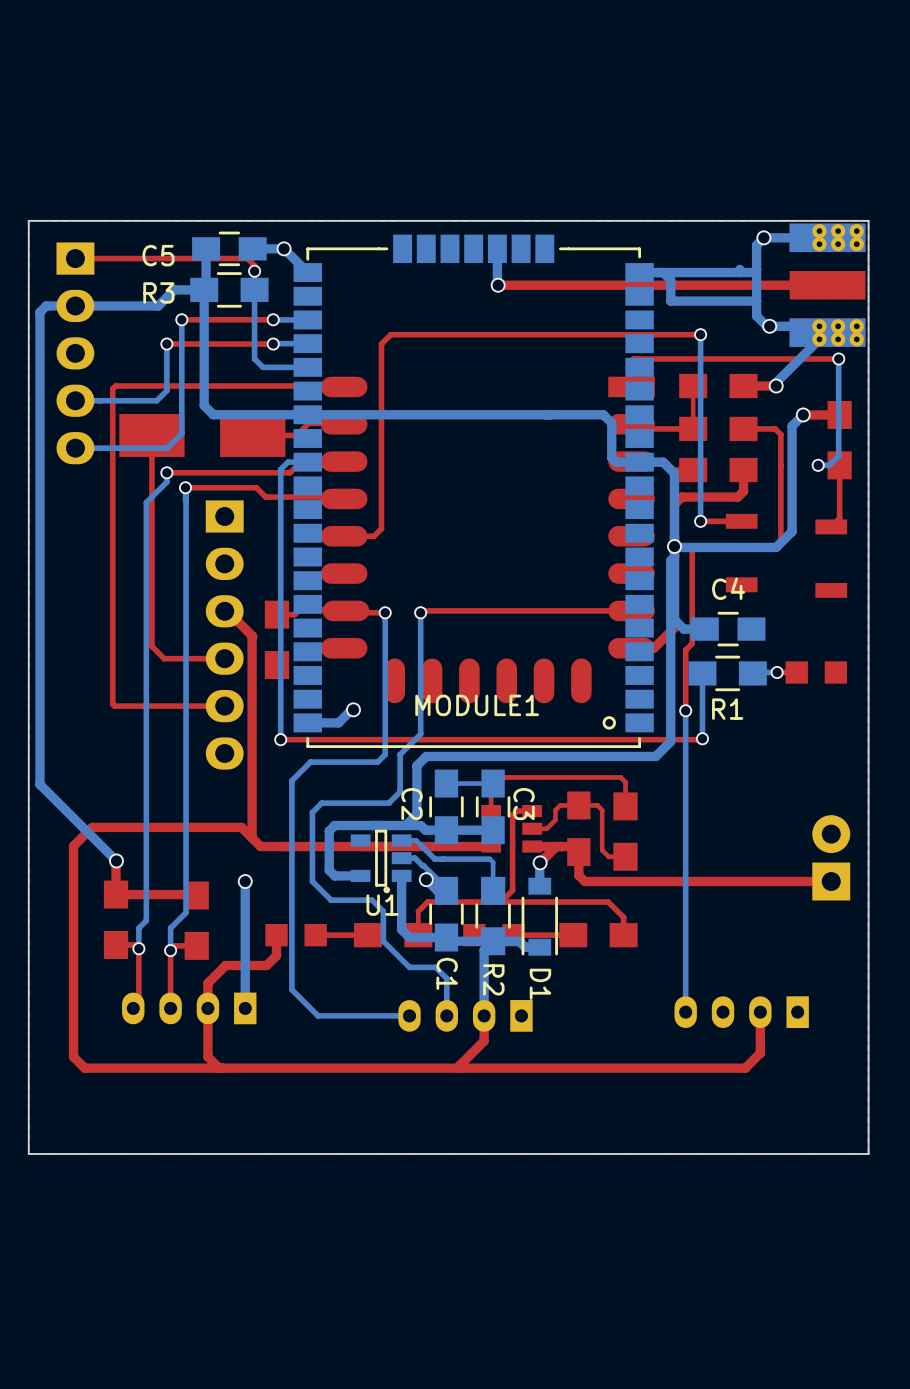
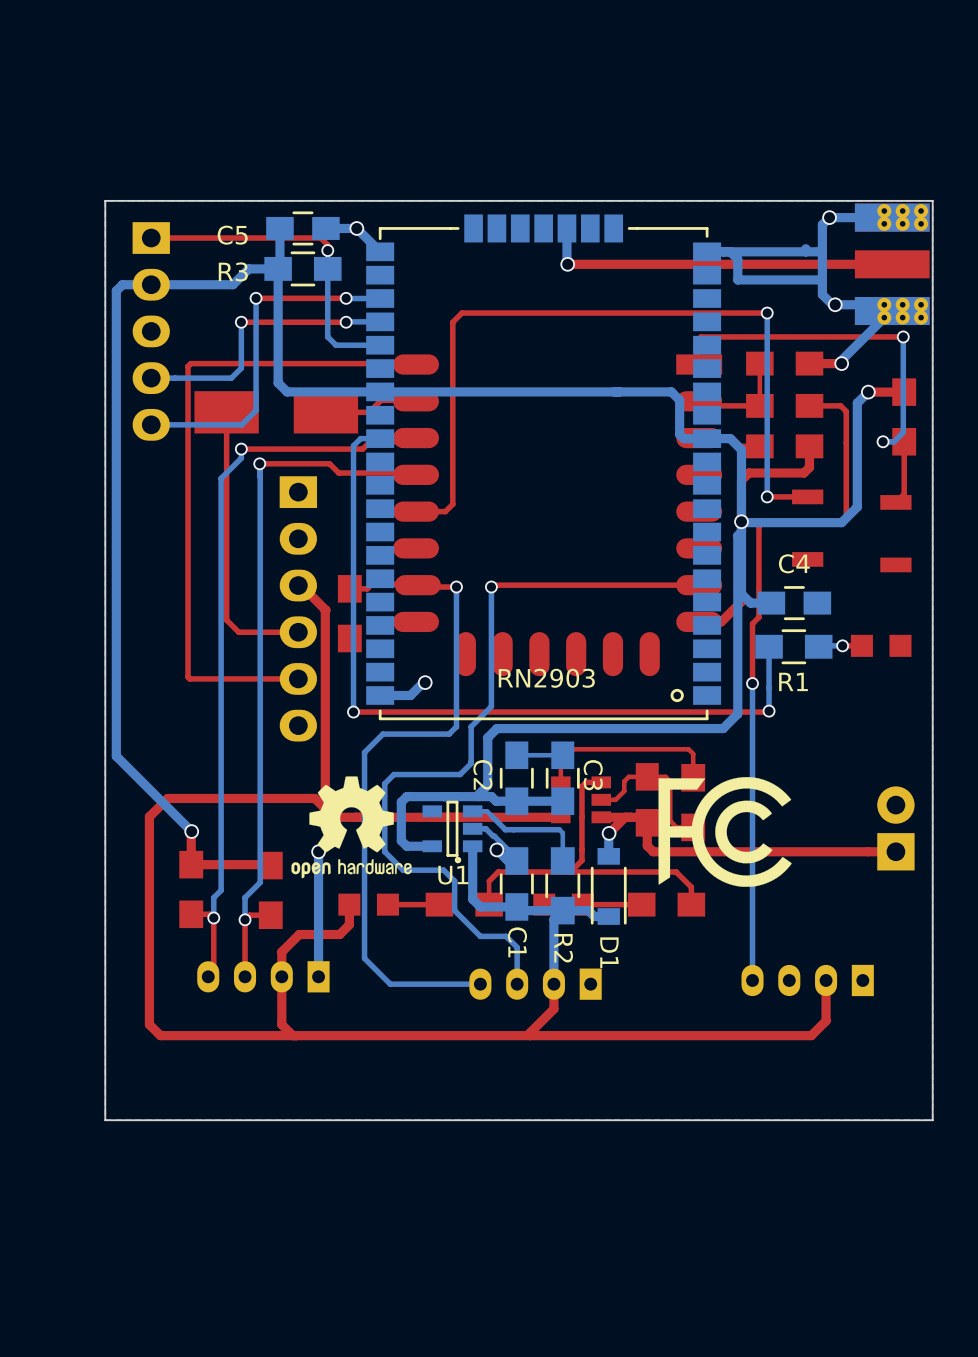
MODULE1 name: MODULE1 (477, 705) -> RN2903 (546, 678)
drawing: none -> [291, 776, 412, 879]
drawing: none -> [658, 777, 792, 887]

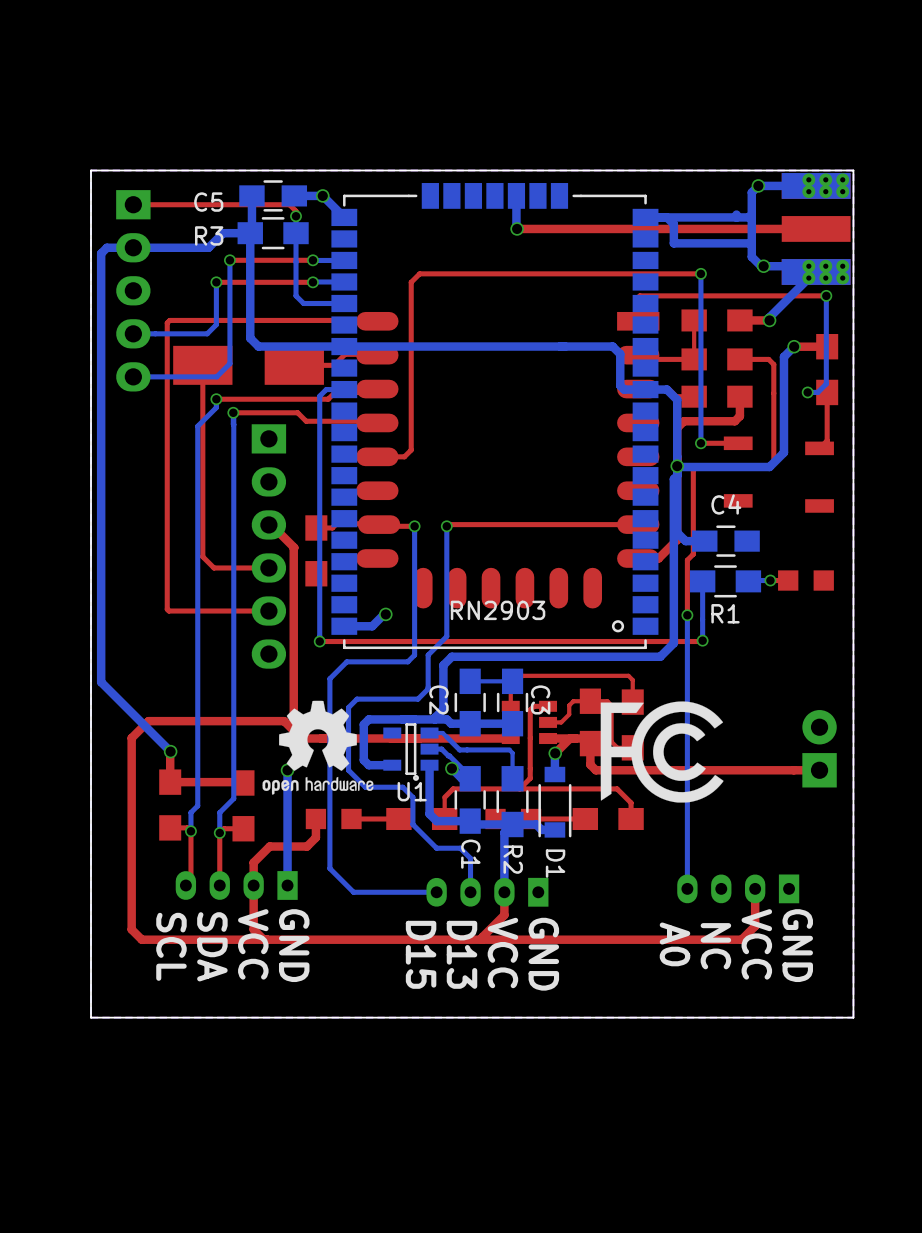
text: none -> A0 (674, 944)
text: none -> VCC (253, 944)
text: none -> GND (294, 945)
text: none -> VCC (756, 944)
text: none -> GND (797, 945)
text: none -> NC (715, 946)
text: none -> SCL (171, 946)
text: none -> SDA (212, 946)
text: none -> VCC (502, 953)
text: none -> D15 (421, 954)
text: none -> D13 (461, 954)
text: none -> GND (543, 954)

